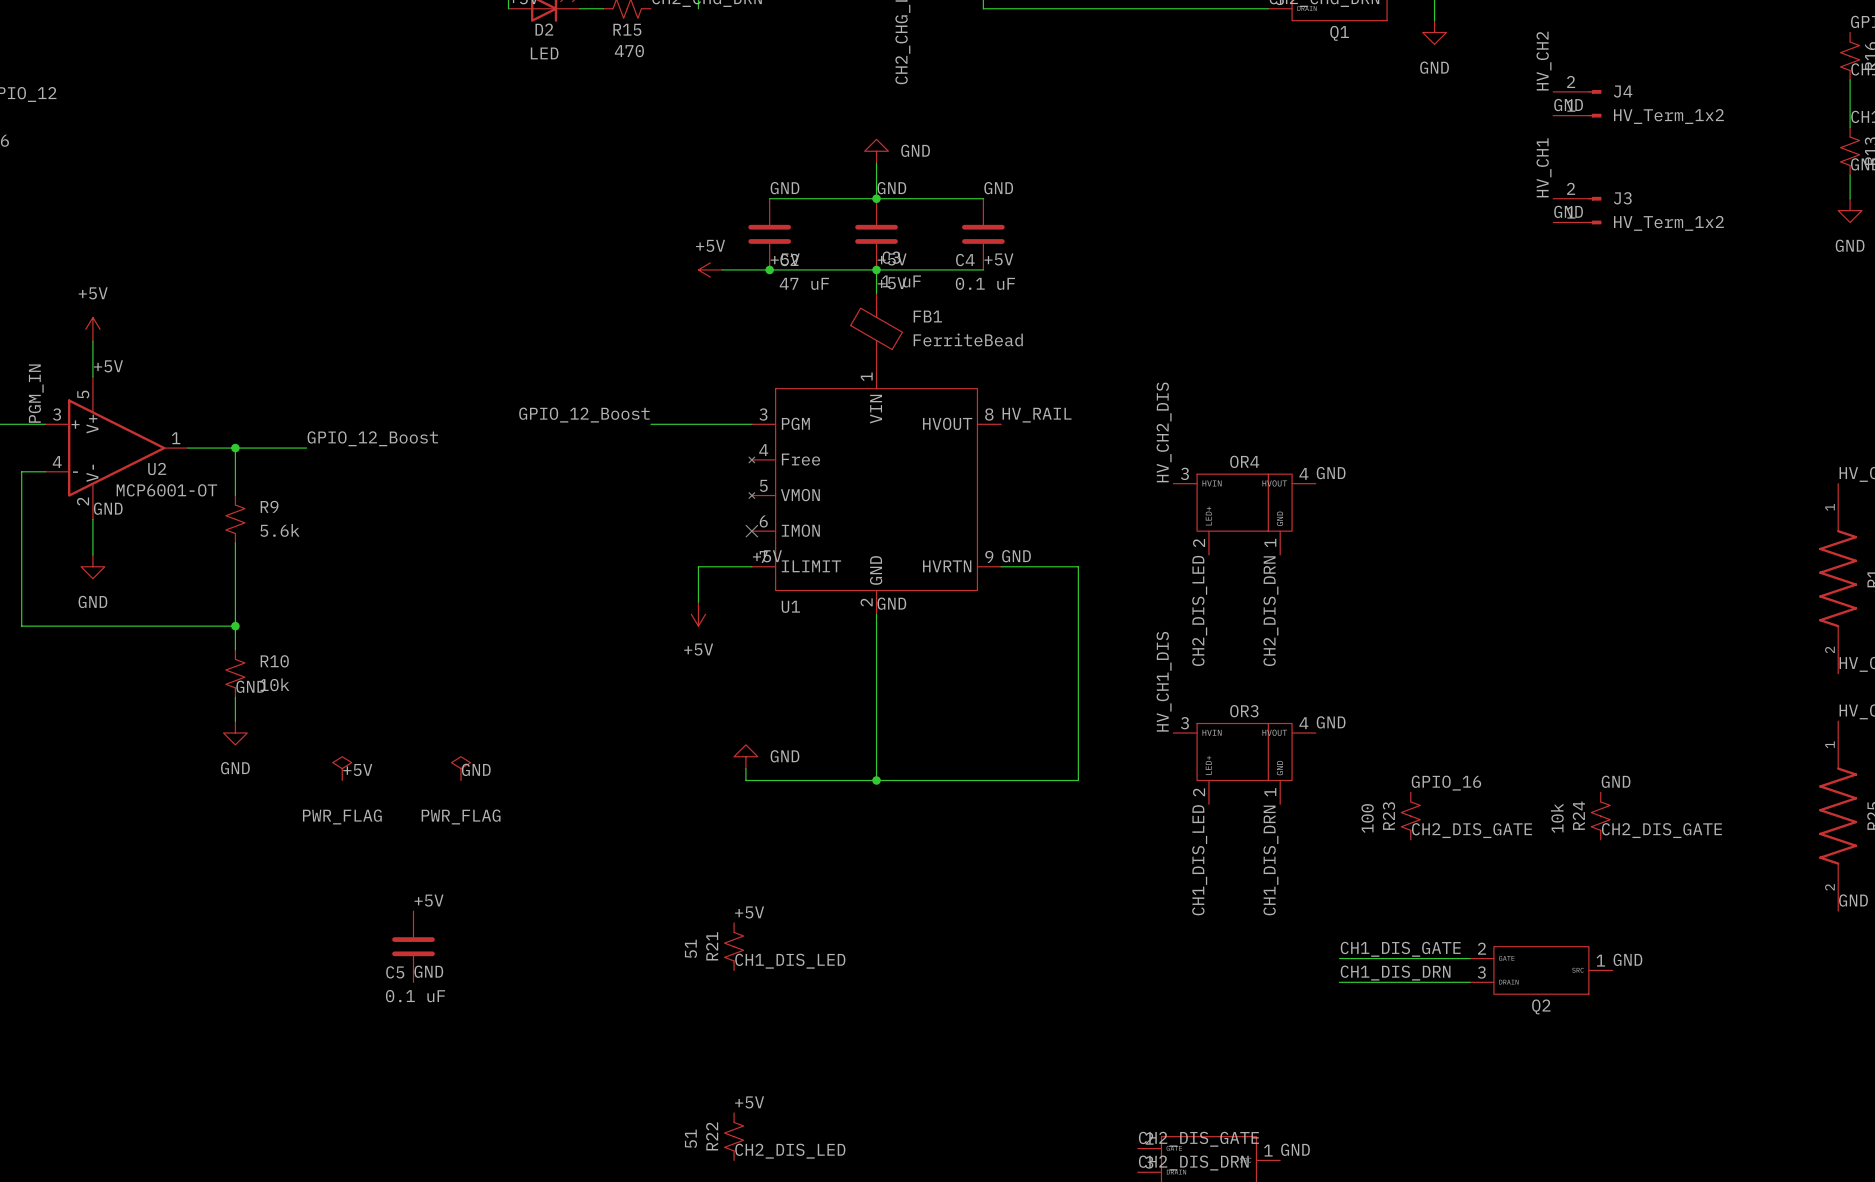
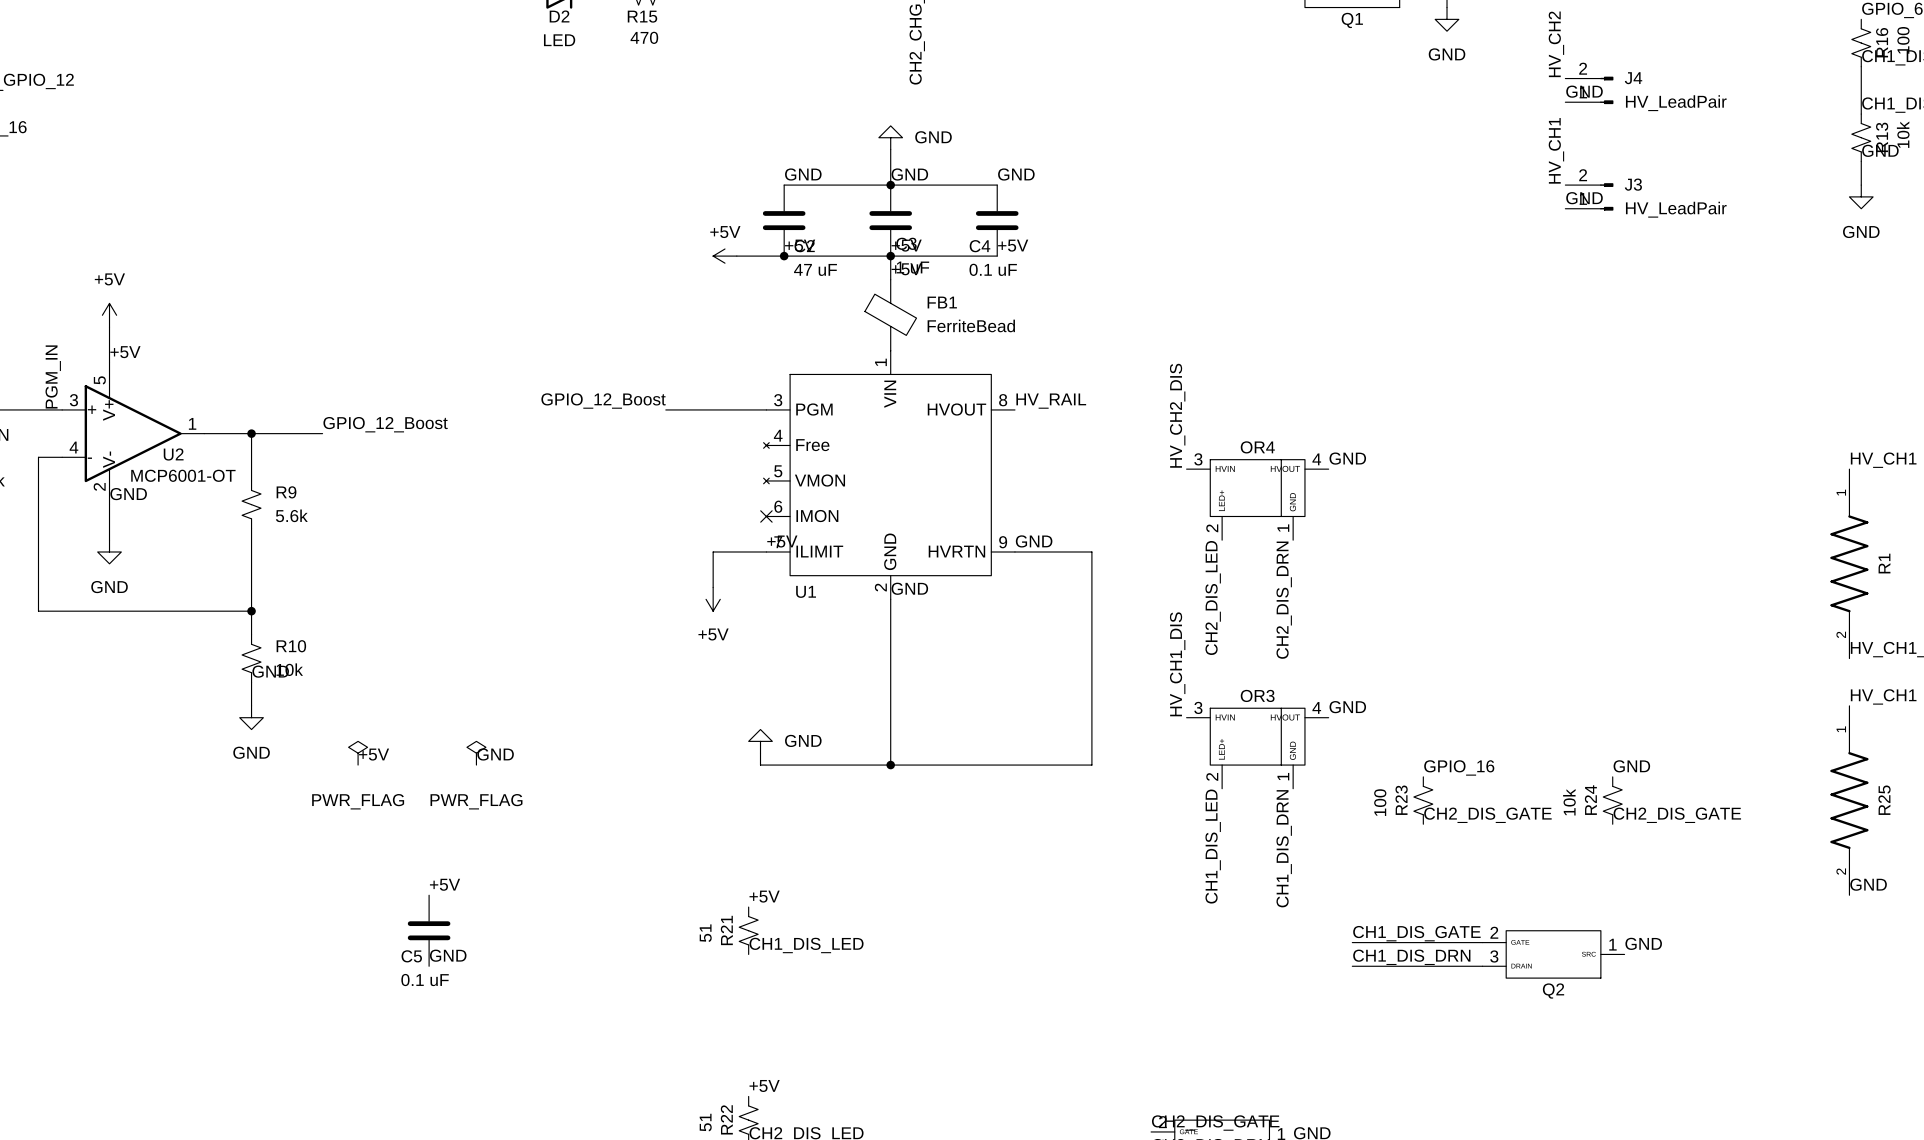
J4 value: HV_Term_1x2 (1668, 116) -> HV_LeadPair (1676, 103)
J3 value: HV_Term_1x2 (1668, 223) -> HV_LeadPair (1676, 209)

